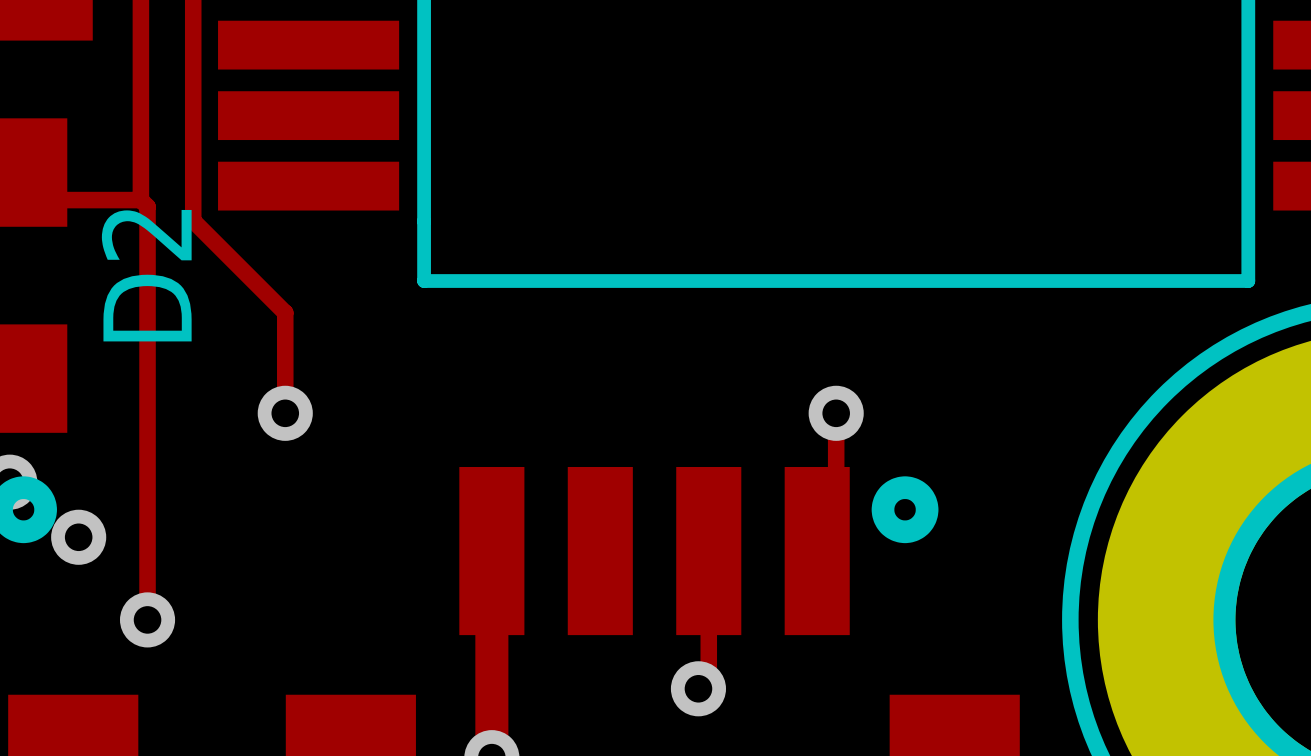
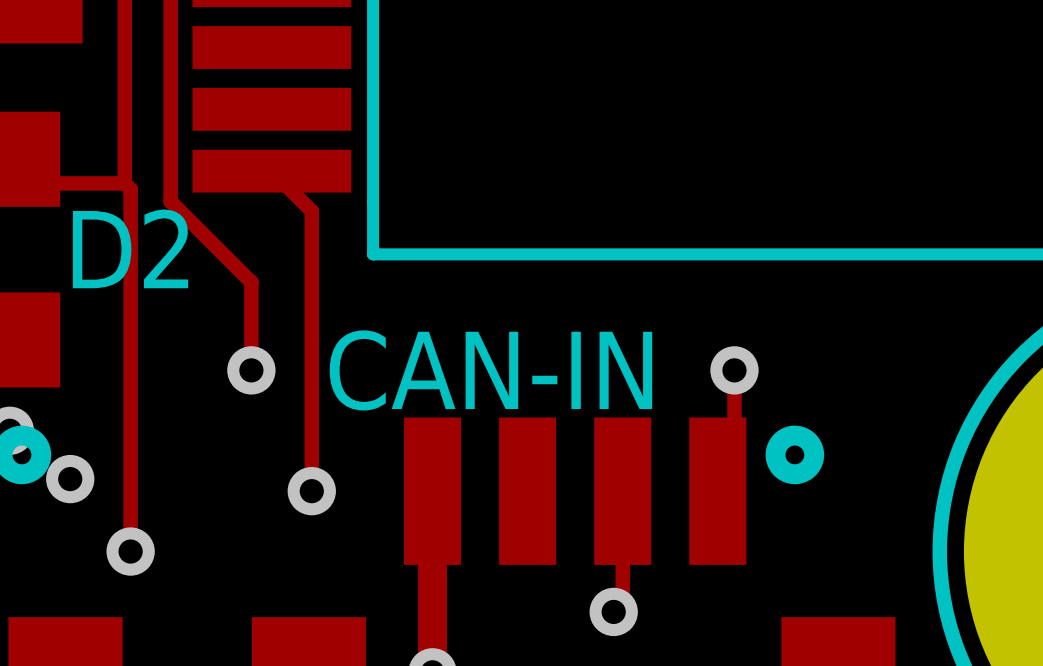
track: none -> (271, 171) (311, 211) (311, 491)
D2 name rotation: 0° (146, 275) -> 90° clockwise (130, 248)
CAN-IN name: none -> CAN-IN (490, 370)
via: none -> (311, 491)

